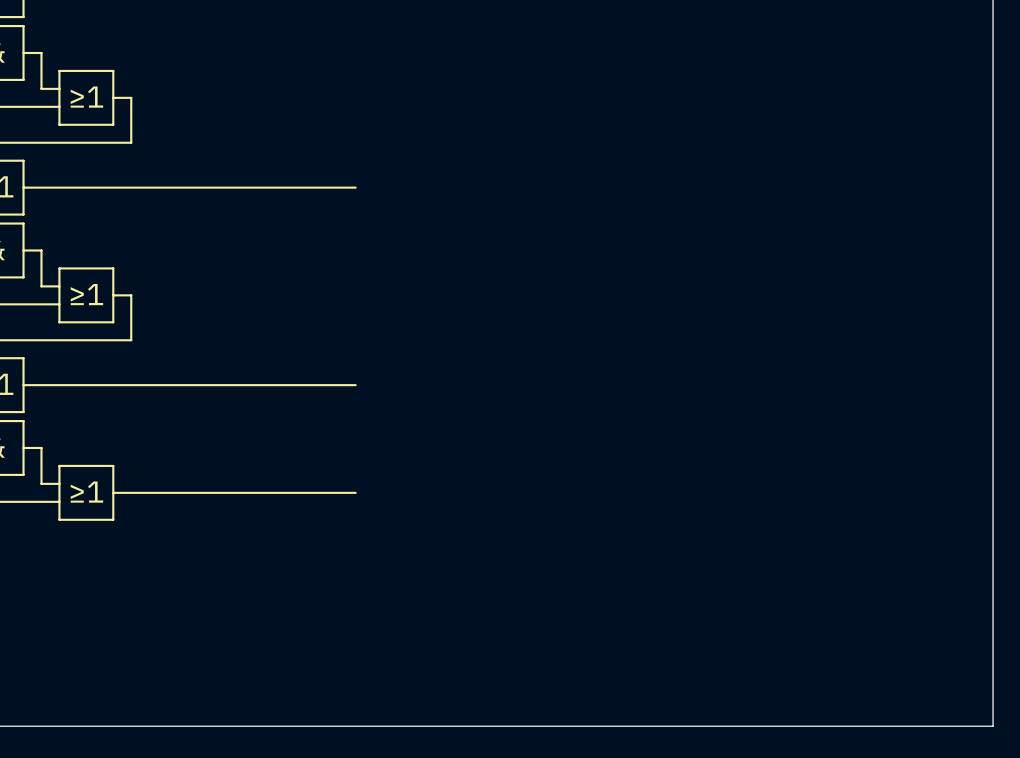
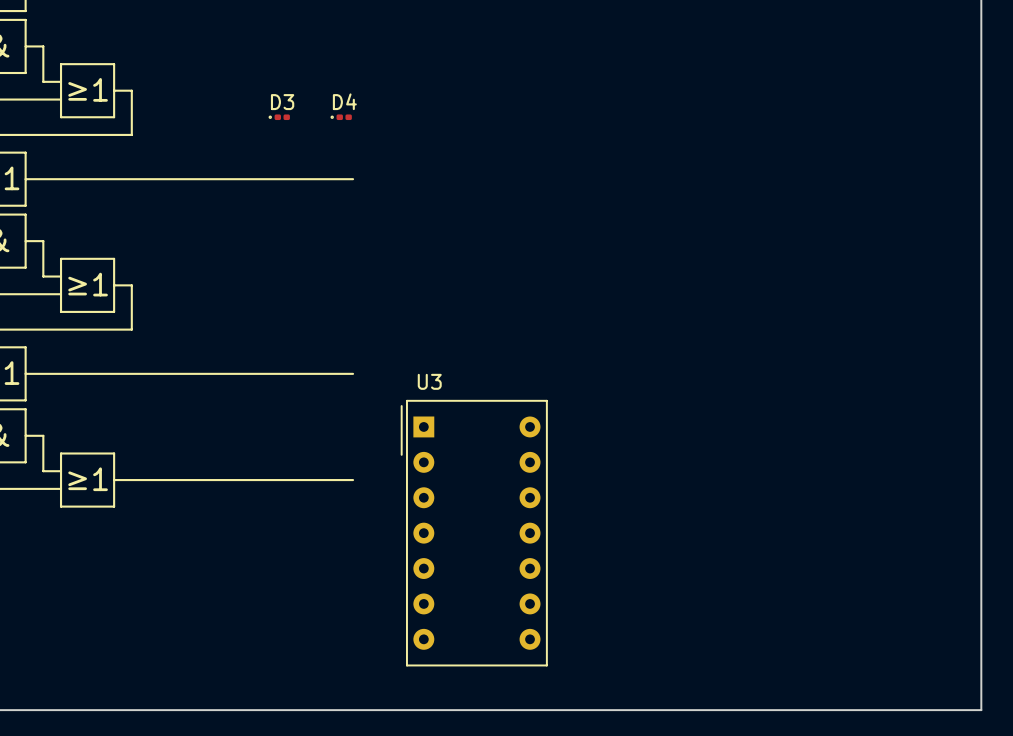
D3: none -> (279, 117)
D4: none -> (341, 117)
U3: none -> (474, 533)

